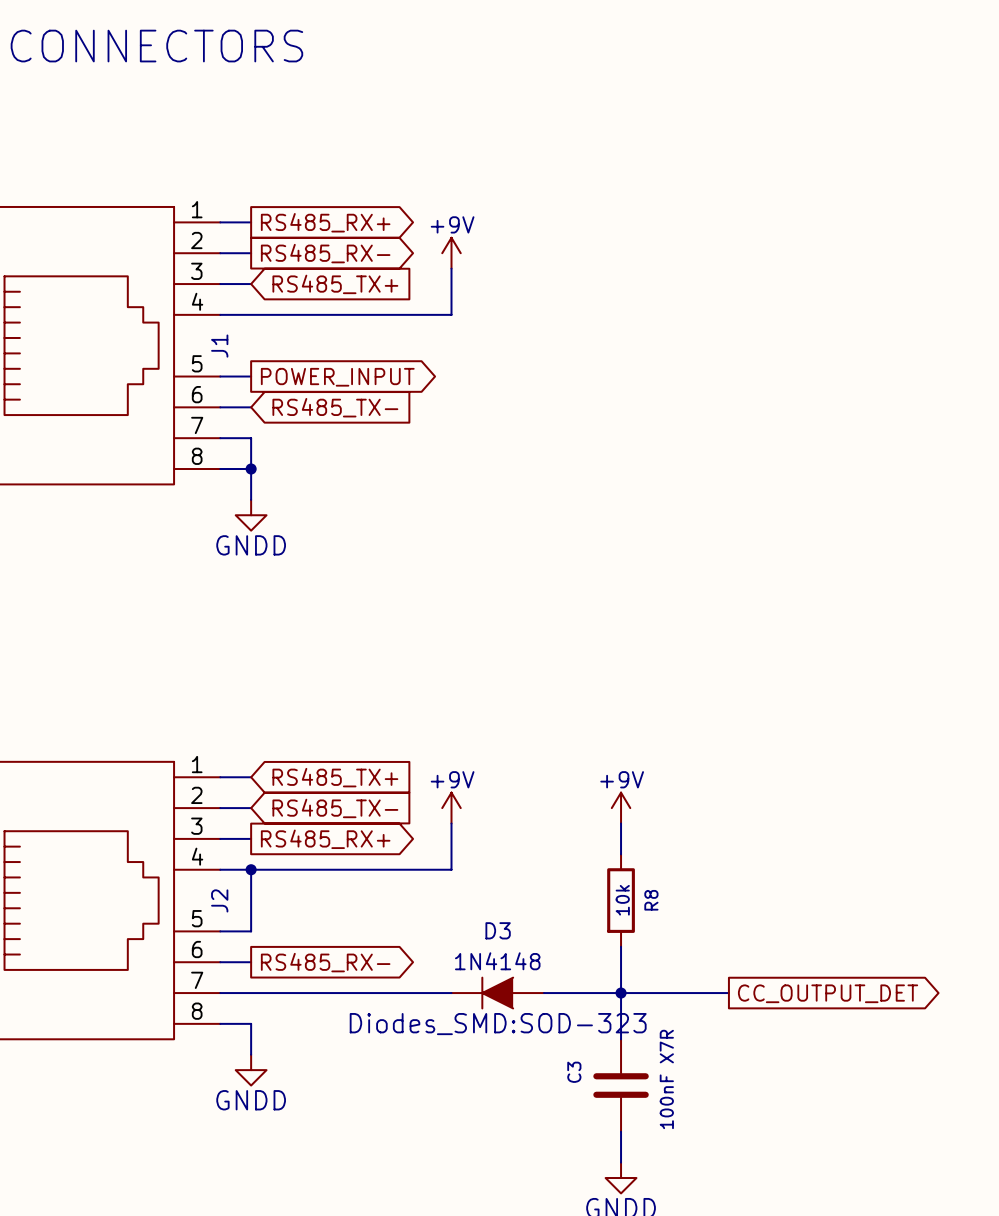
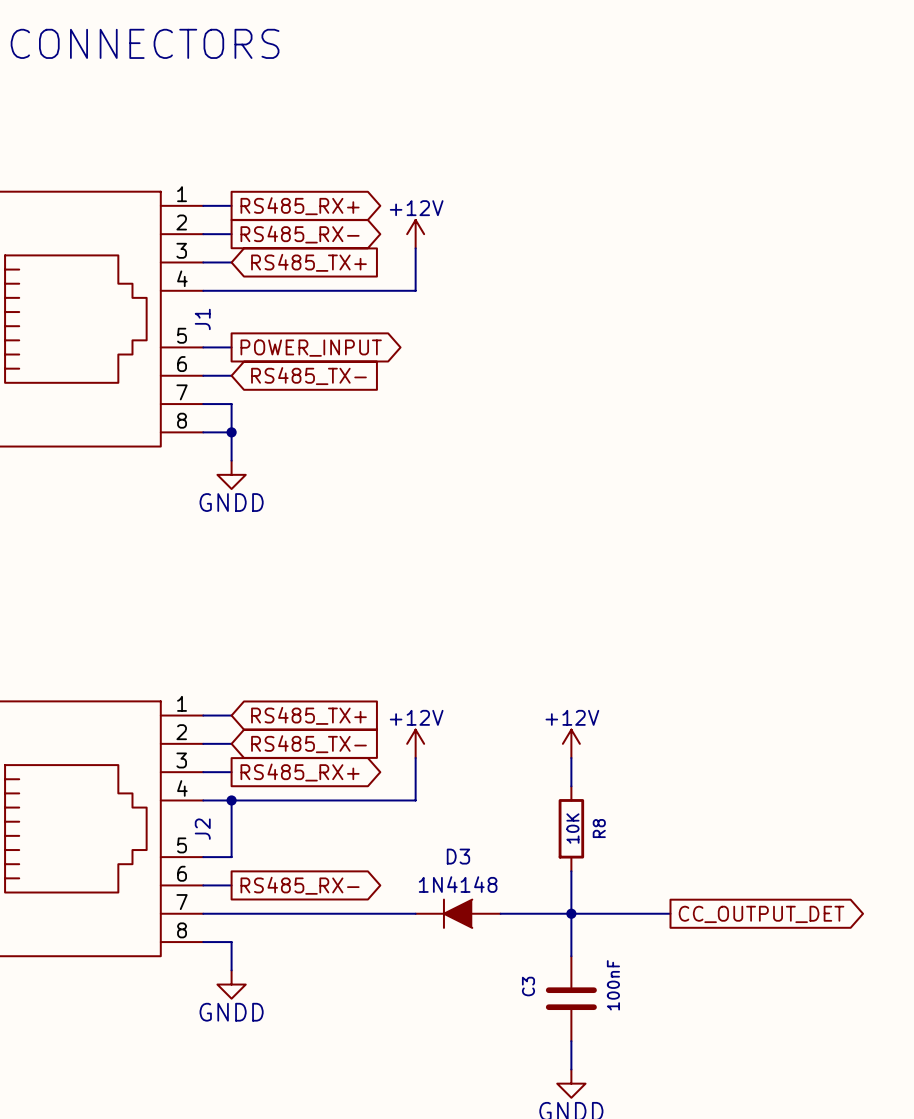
power symbol: +9V (451, 253) -> +12V (415, 234)
power symbol: +9V (451, 808) -> +12V (415, 743)
power symbol: +9V (621, 808) -> +12V (571, 743)
R8 value: 10k (622, 900) -> 10K (572, 828)
D3 text: Diodes_SMD:SOD-323 (498, 1024) -> none
C3 value: 100nF X7R (666, 1079) -> 100nF (613, 985)

